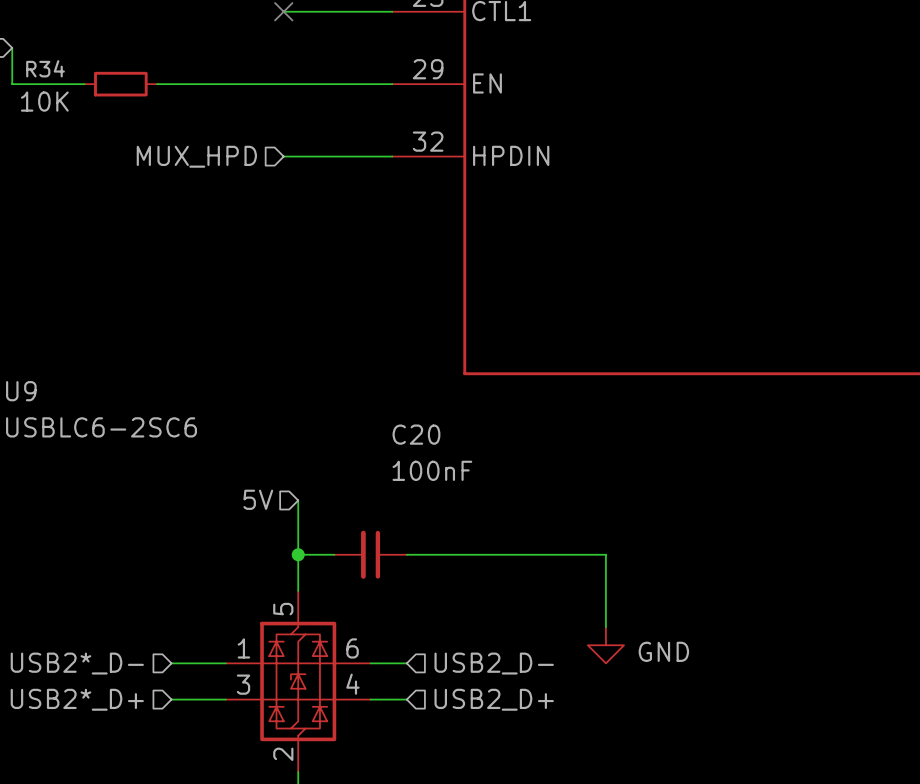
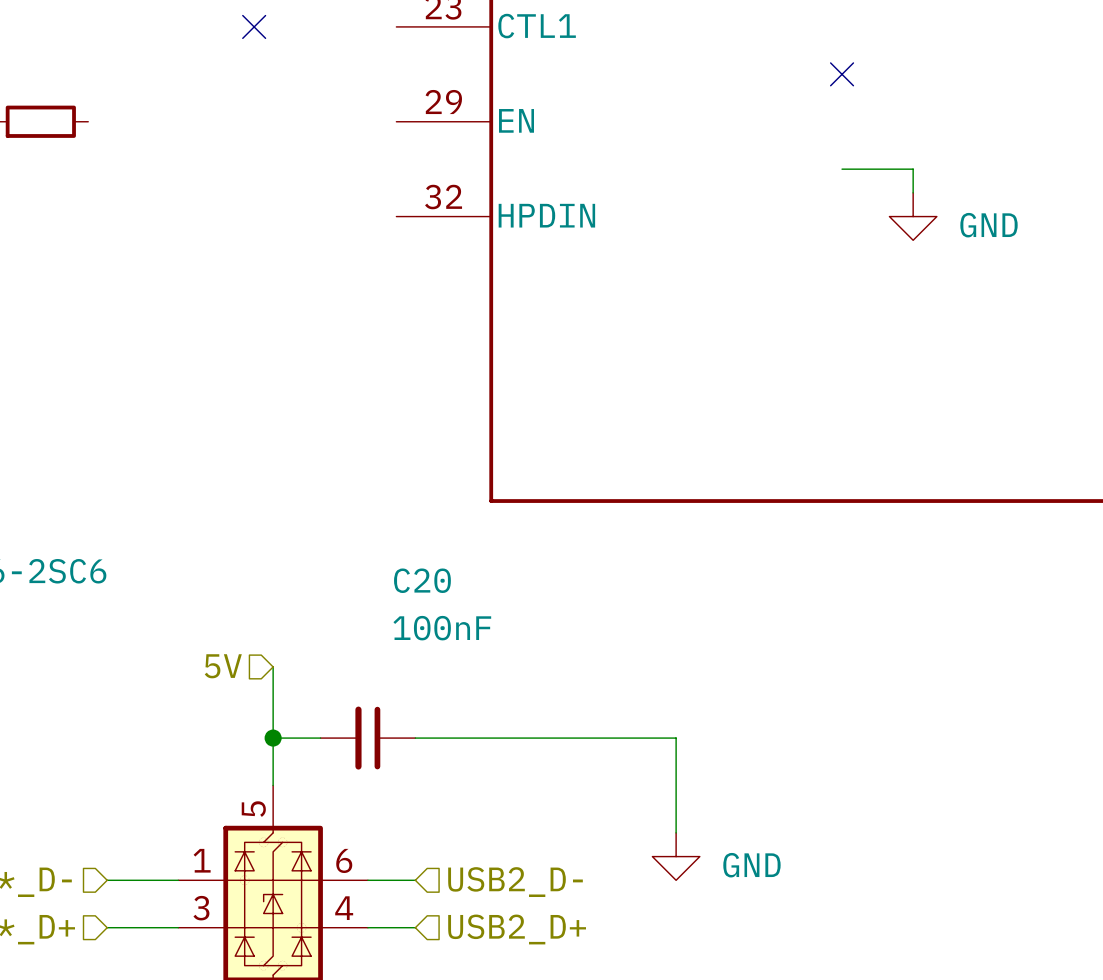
wire: (283, 11) (392, 11) -> none
no-connect mark: none -> (842, 74)
wire: (157, 84) (392, 84) -> none
wire: none -> (842, 169) (913, 169) (913, 192)
hierarchical label: MUX_HPD (196, 156) -> none
wire: (283, 156) (392, 156) -> none
power symbol: none -> GND (913, 216)

